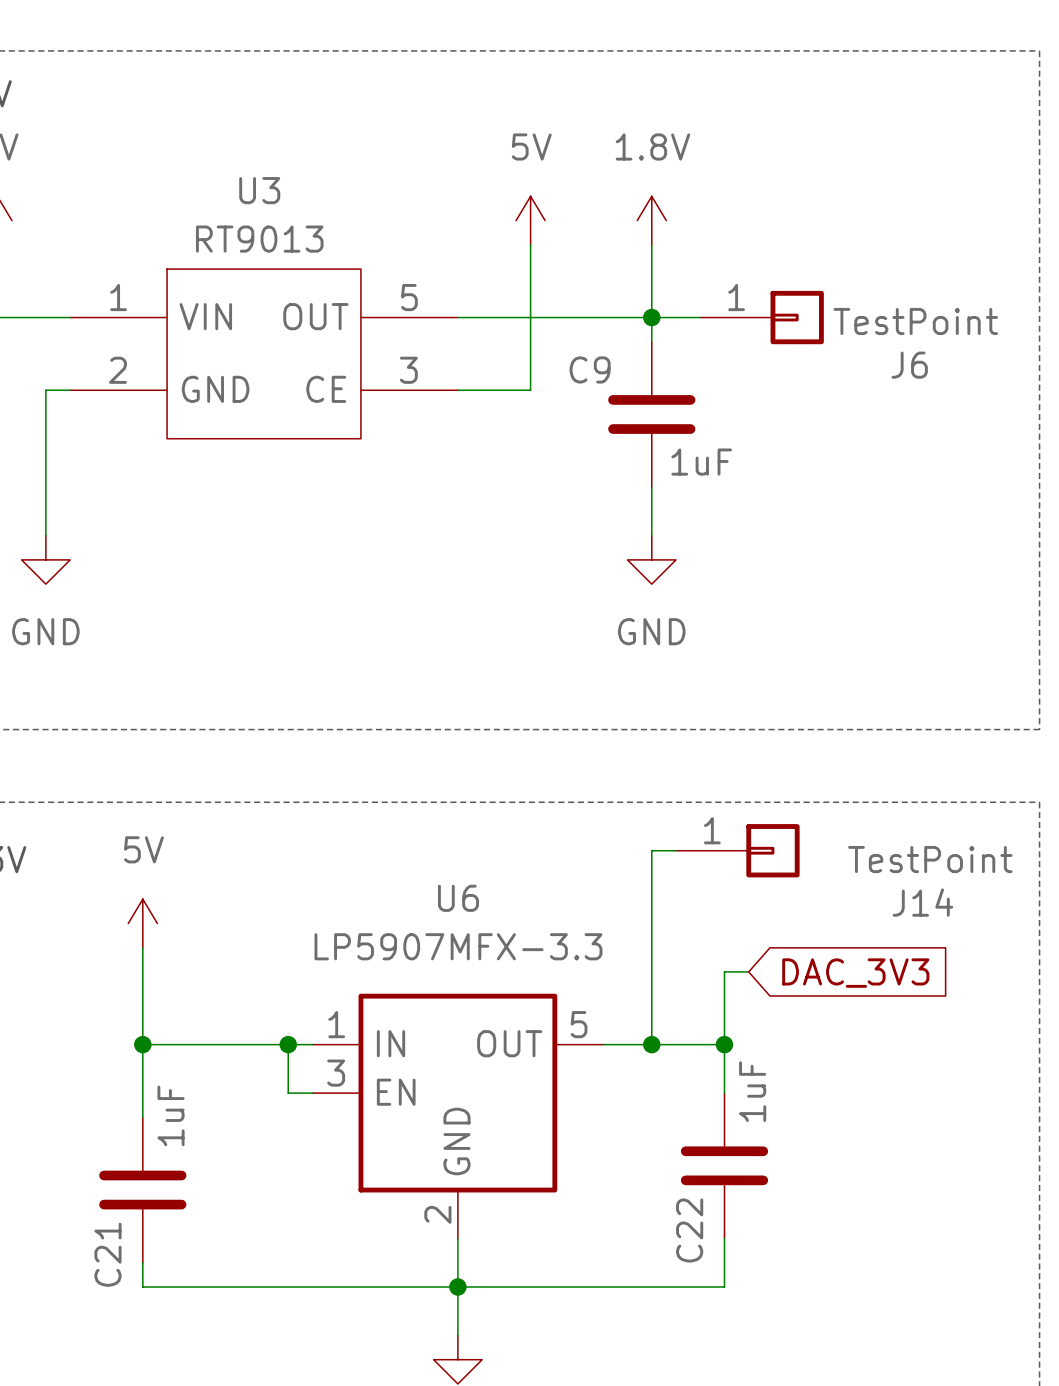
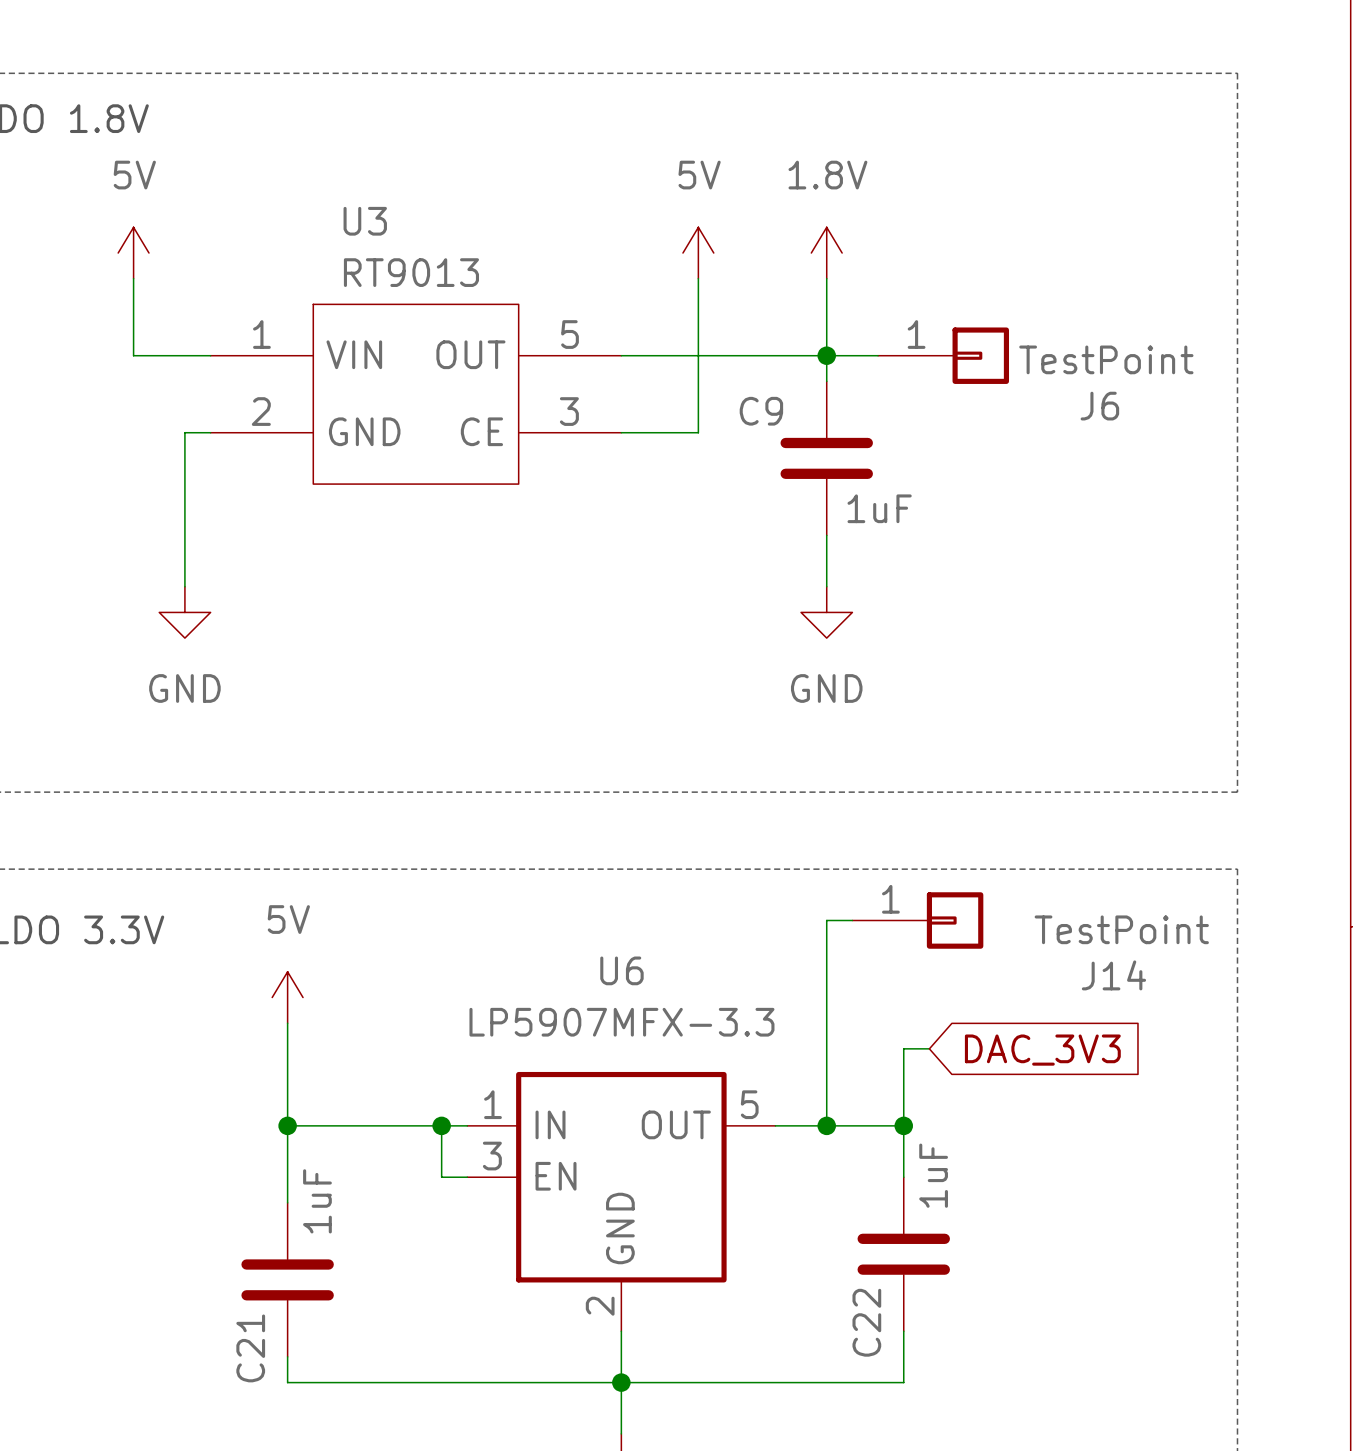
U3 name position: U3 (259, 190) -> U3 (365, 221)

